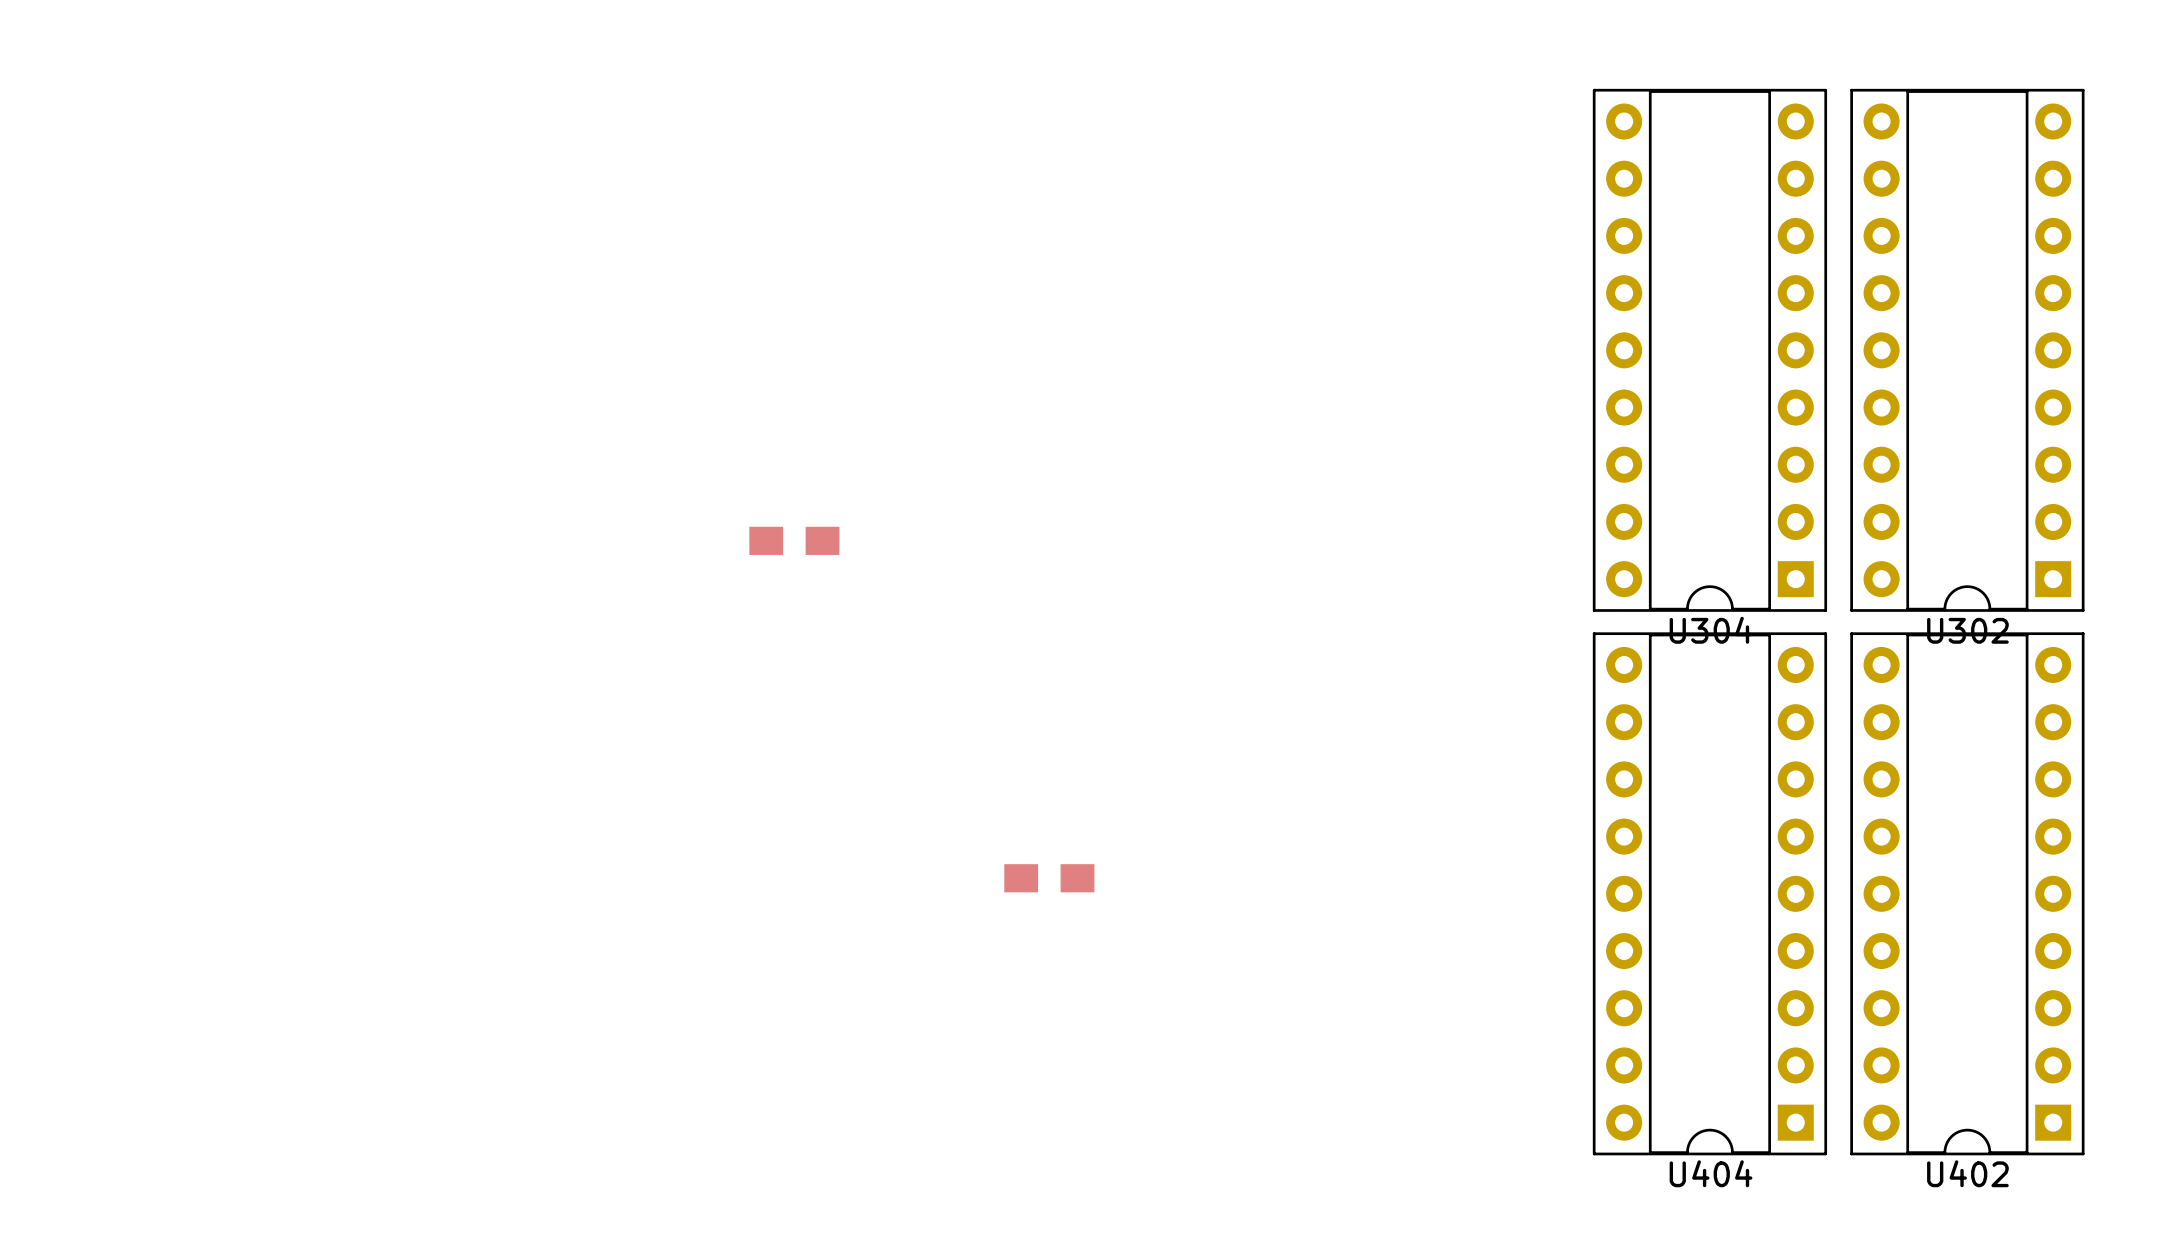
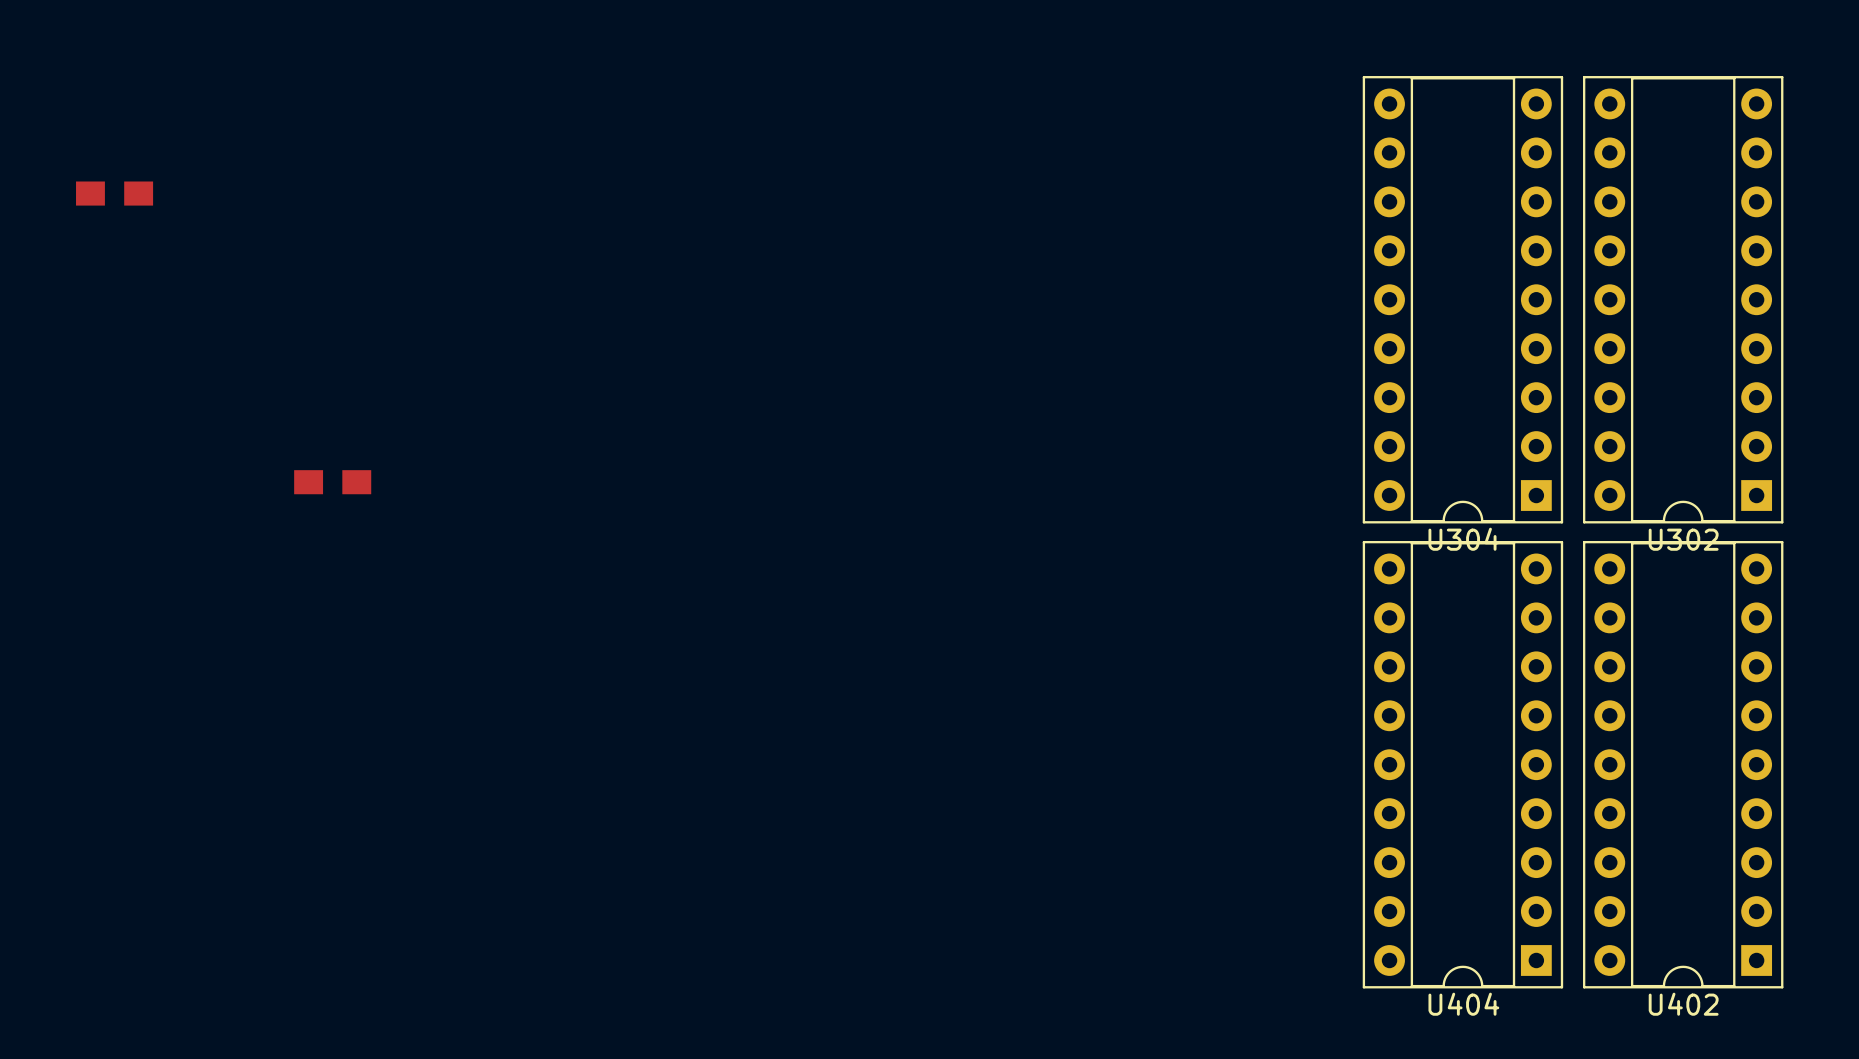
part: none -> (114, 193)
part: (794, 540) -> none
part: none -> (332, 482)
part: (1049, 878) -> none

